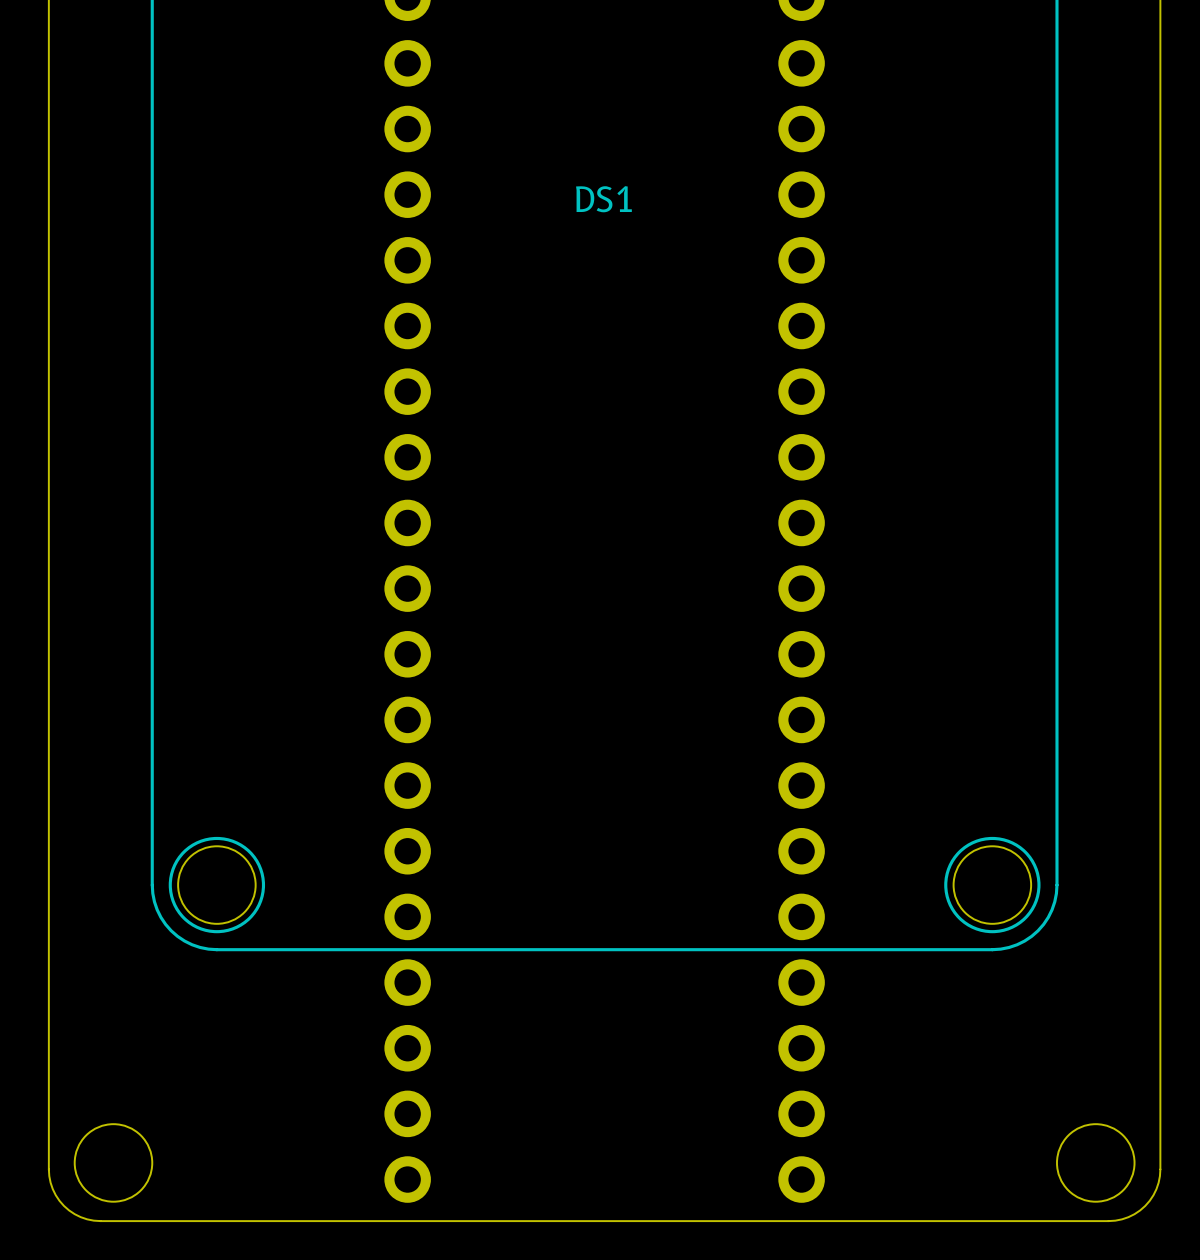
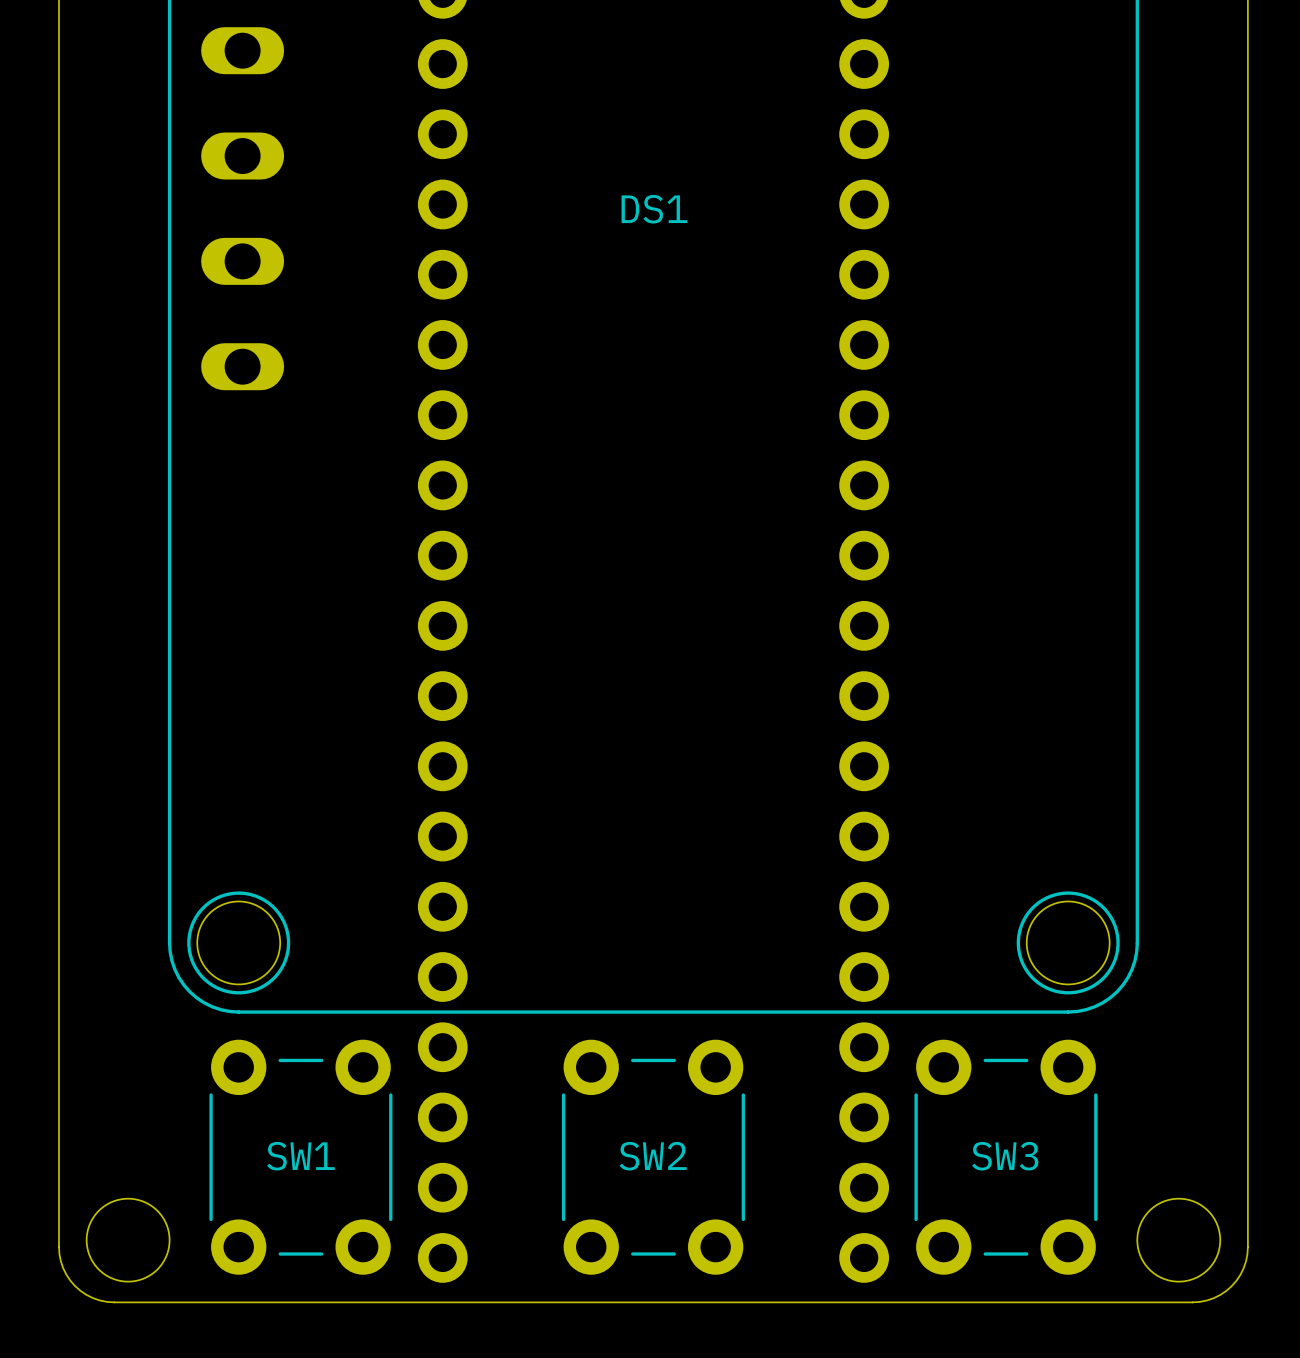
part: none -> (242, 103)
part: none -> (242, 314)
SW1: none -> (300, 1157)
SW2: none -> (653, 1157)
SW3: none -> (1005, 1157)

